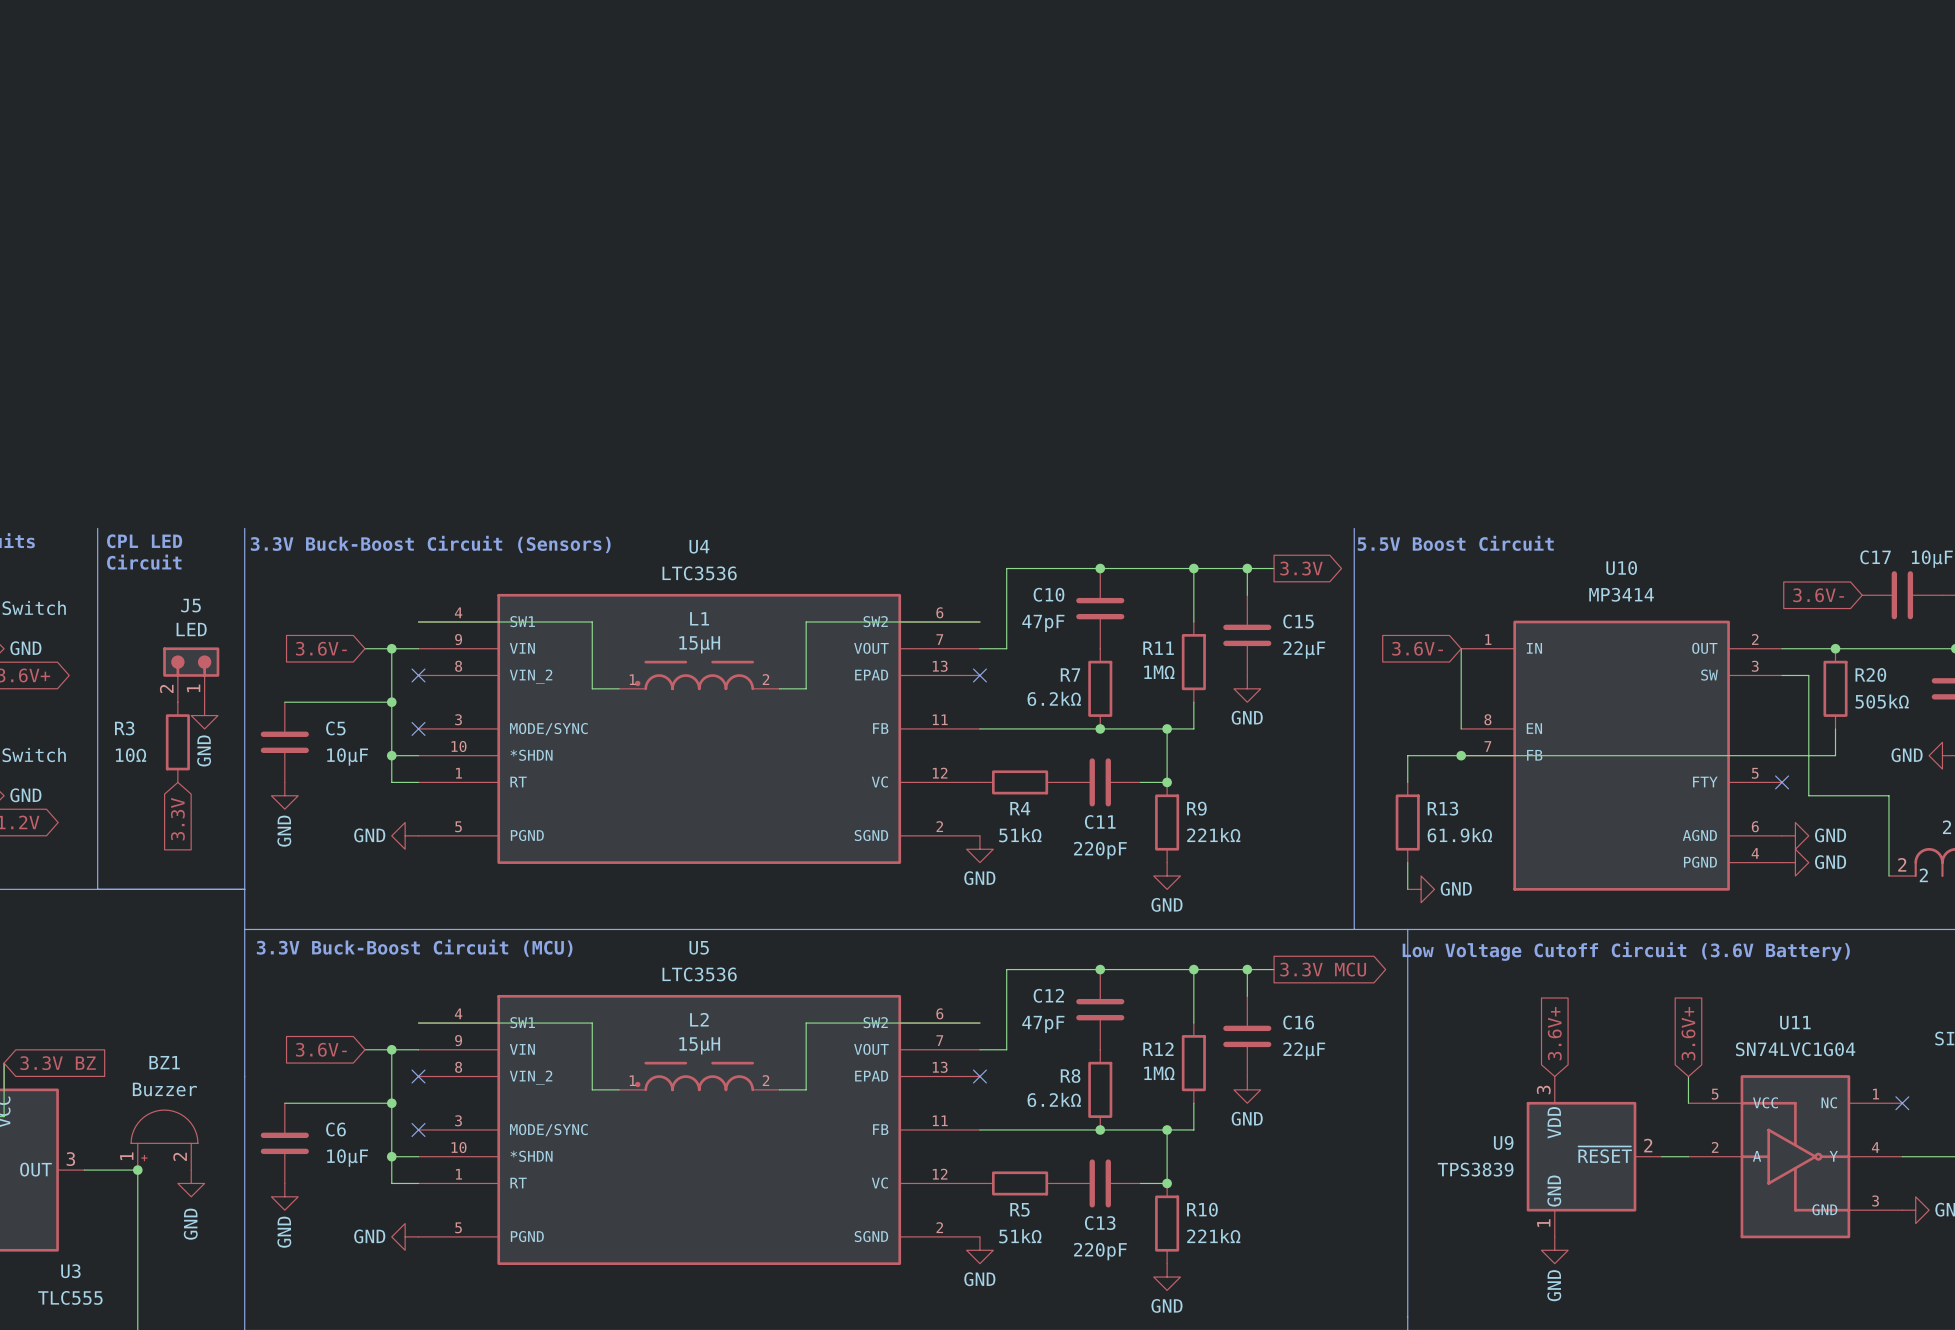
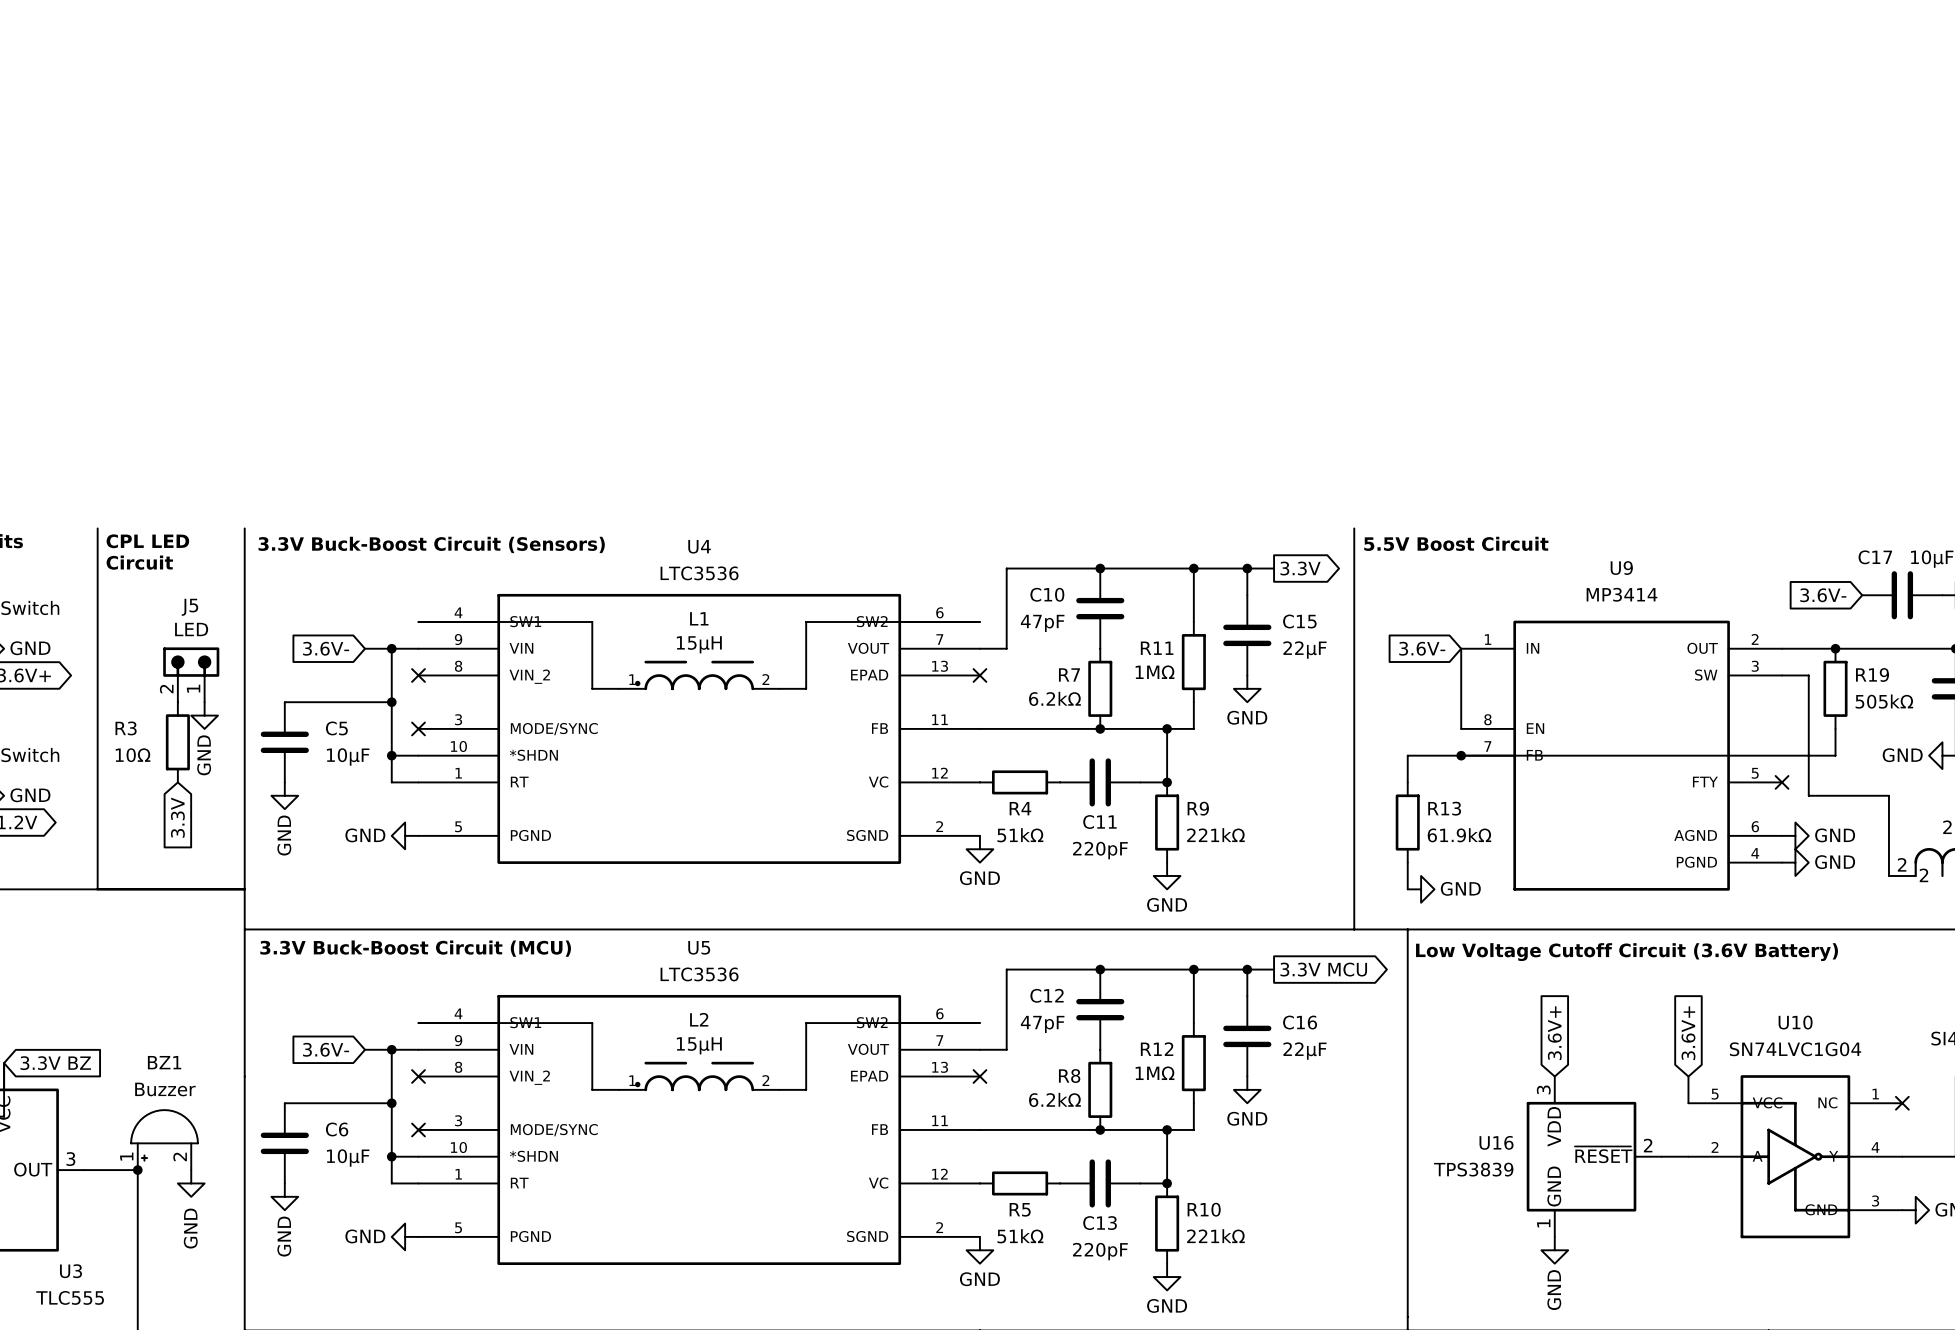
U10 name: U10 (1621, 568) -> U9 (1621, 568)
R20 name: R20 (1870, 674) -> R19 (1872, 674)
U11 name: U11 (1795, 1022) -> U10 (1795, 1022)
U9 name: U9 (1503, 1142) -> U16 (1496, 1142)

